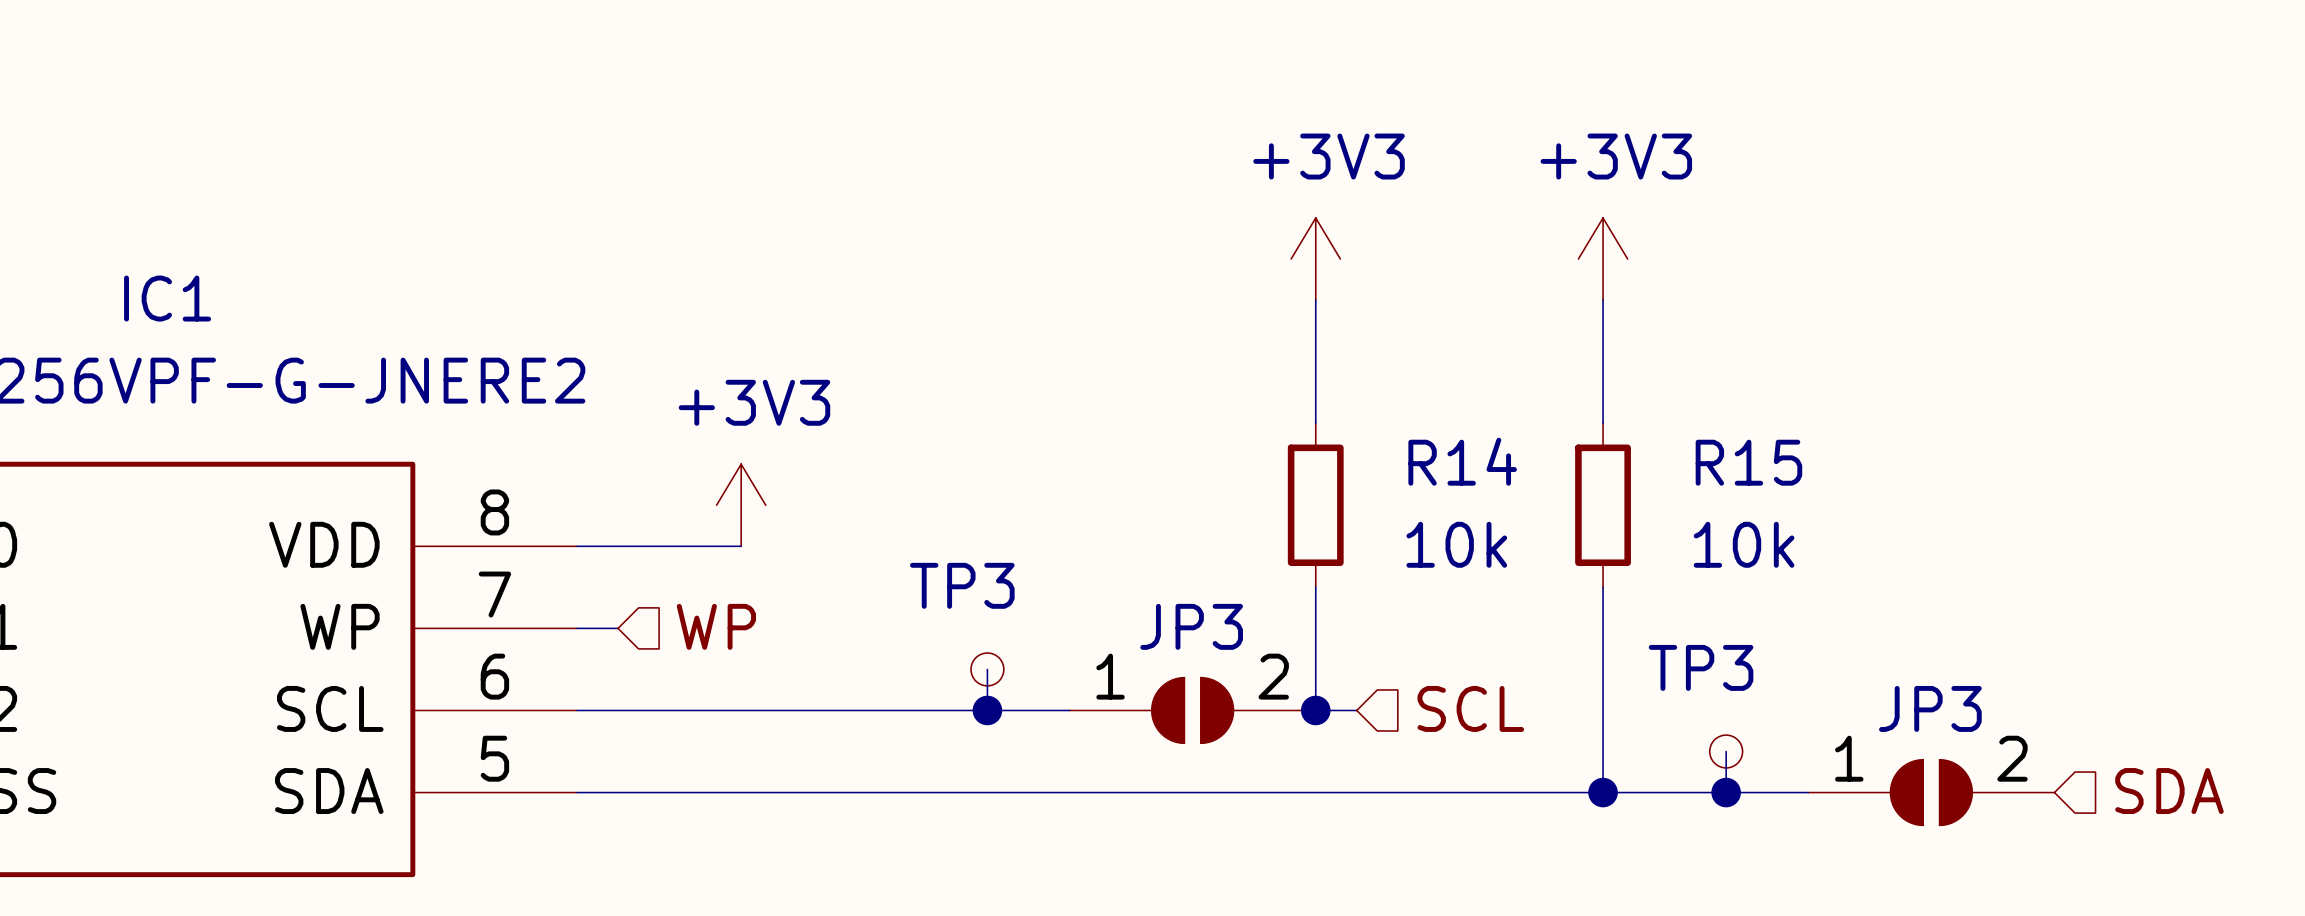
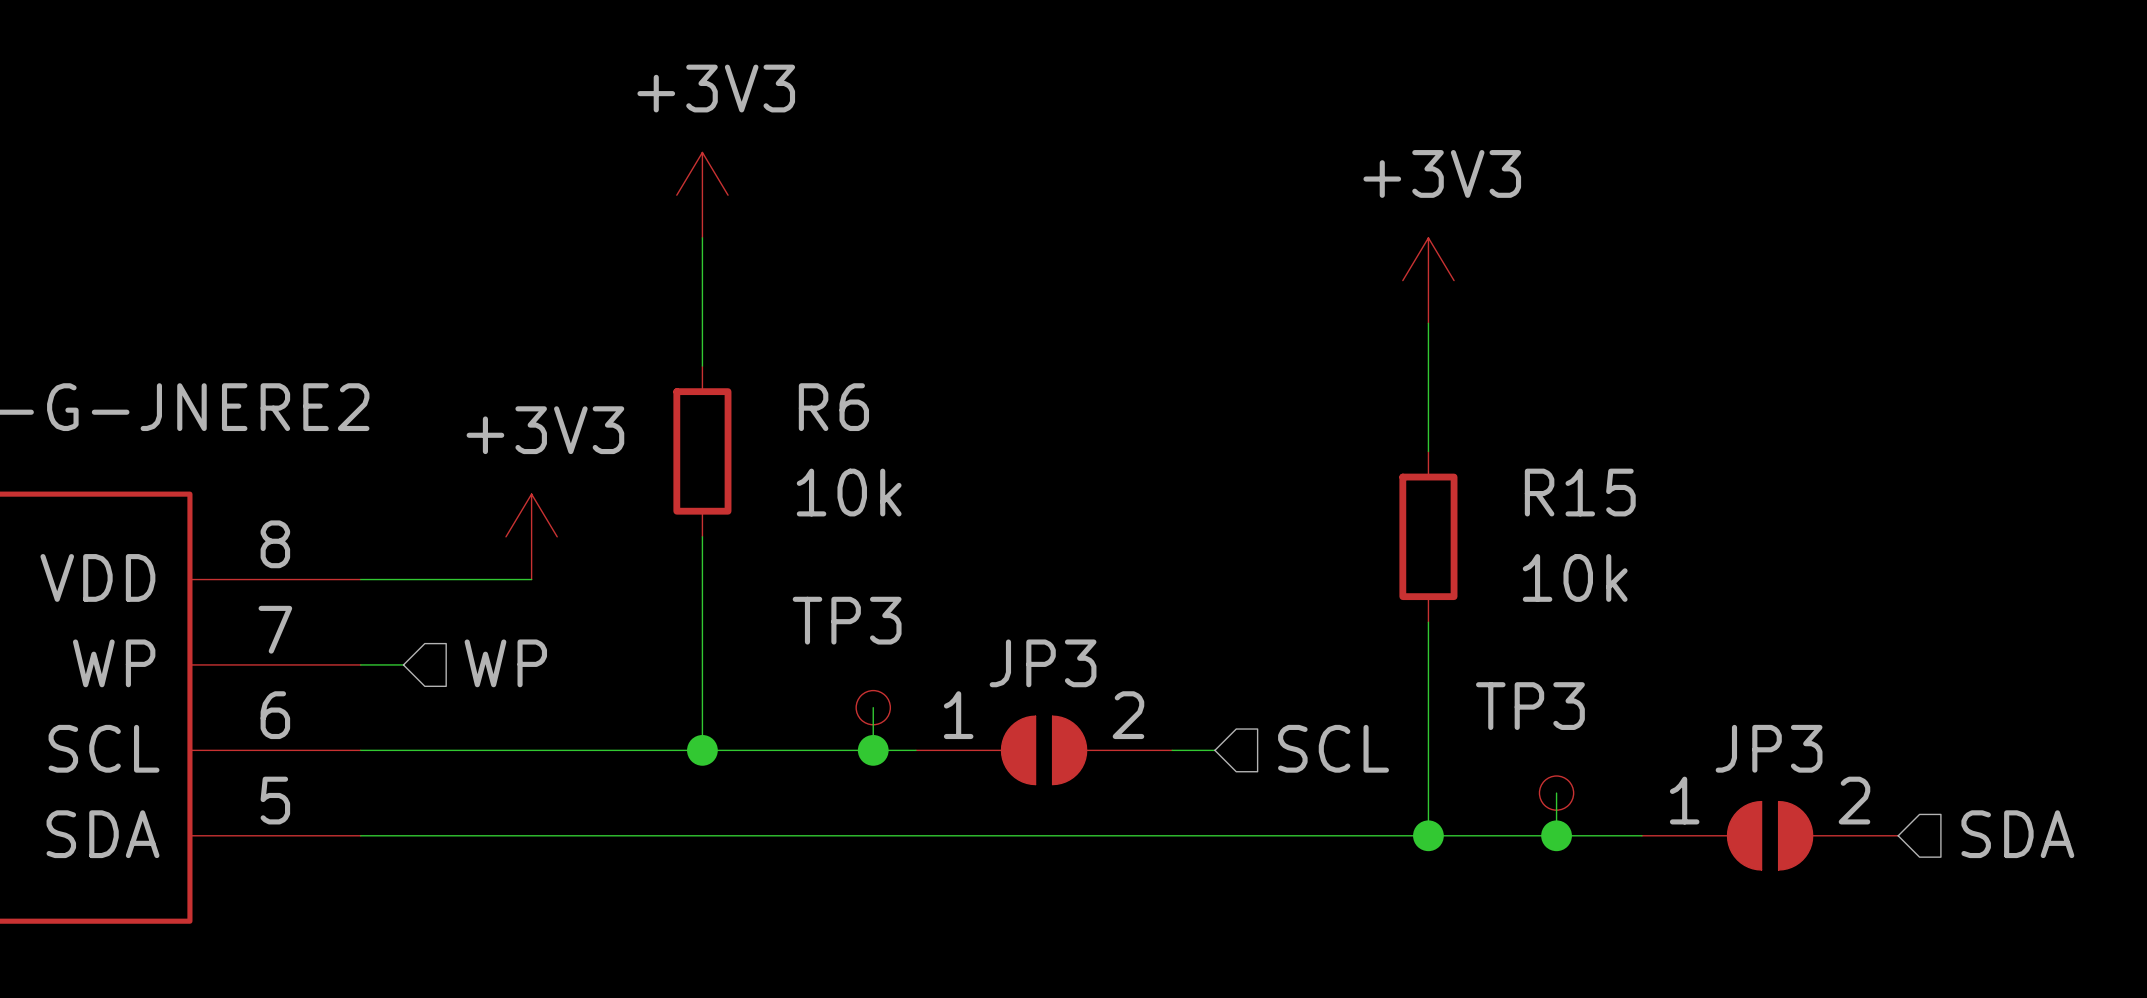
power symbol position: +3V3 (1315, 259) -> +3V3 (702, 195)
wire: (1315, 300) (1315, 423) -> (702, 237) (702, 366)
R6: none -> 10k (702, 451)
wire: none -> (702, 536) (702, 750)
R14: 10k (1315, 505) -> none
wire: (1315, 587) (1315, 710) (1356, 710) -> (1214, 750) (1172, 750)
wire: (987, 669) (987, 710) -> none
TP3 position: (987, 669) -> (873, 707)
wire: none -> (873, 707) (873, 750) (915, 750)
hierarchical label position: SCL (1470, 708) -> SCL (1333, 748)
junction: none -> (702, 750)
junction: (987, 710) -> none
junction: none -> (873, 750)
JP3 position: (1192, 710) -> (1044, 750)
junction: (1315, 710) -> none

